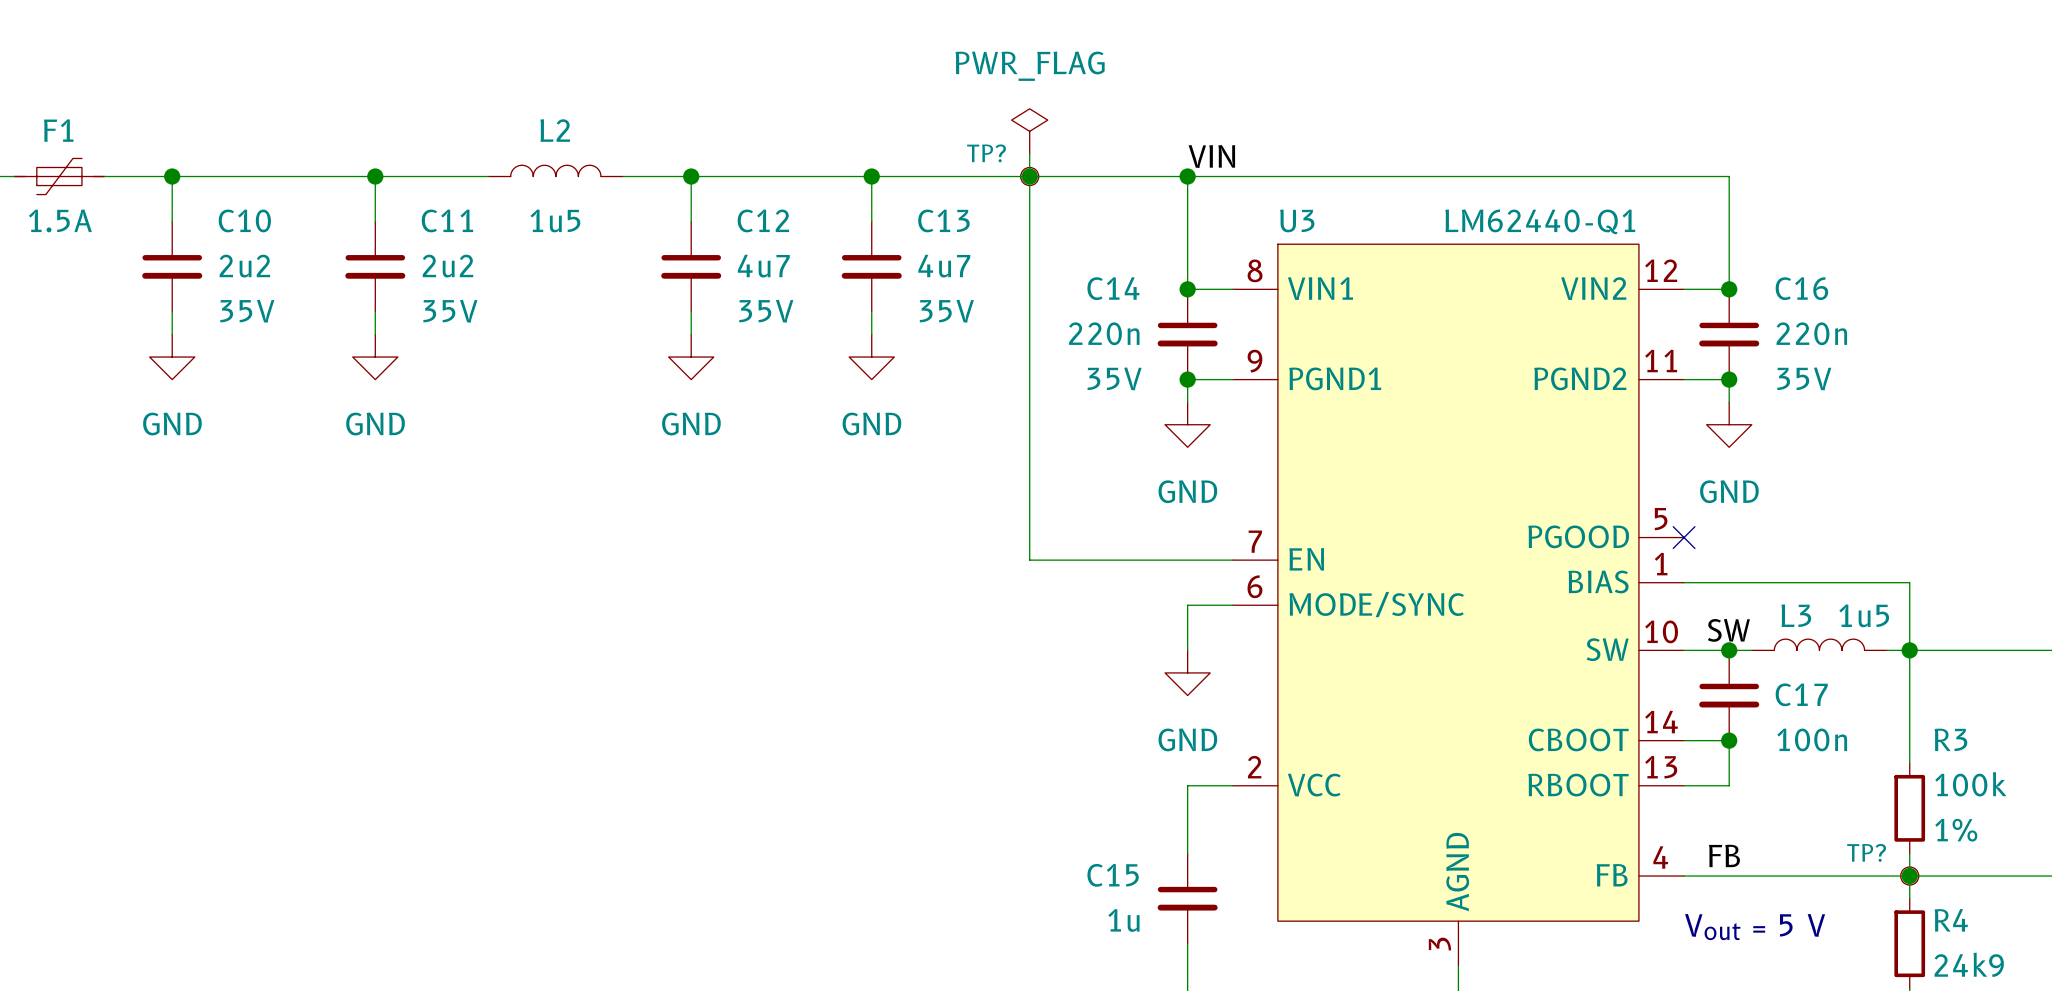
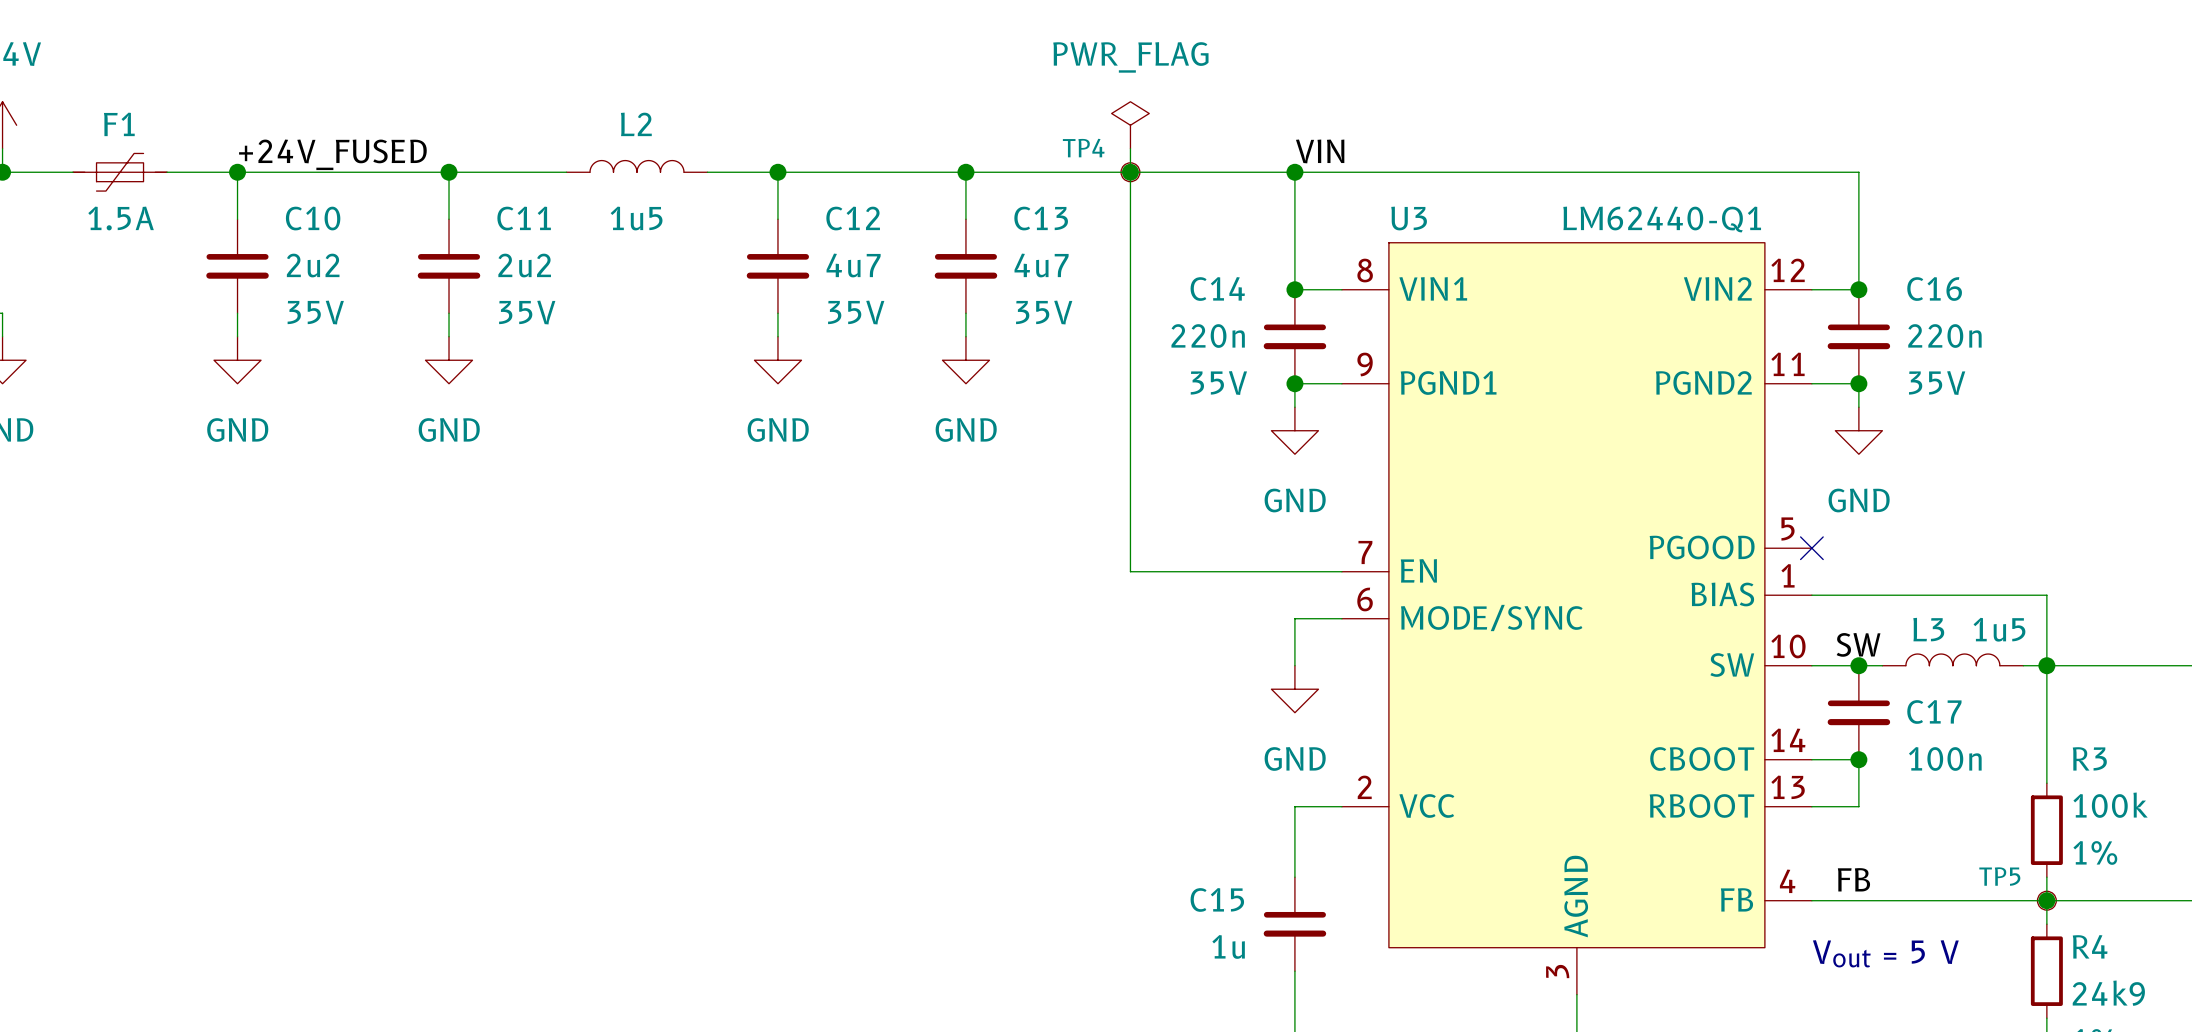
TP? name: TP? (986, 153) -> TP4 (1083, 148)
label: none -> +24V_FUSED (332, 154)
TP? name: TP? (1866, 852) -> TP5 (1999, 876)

